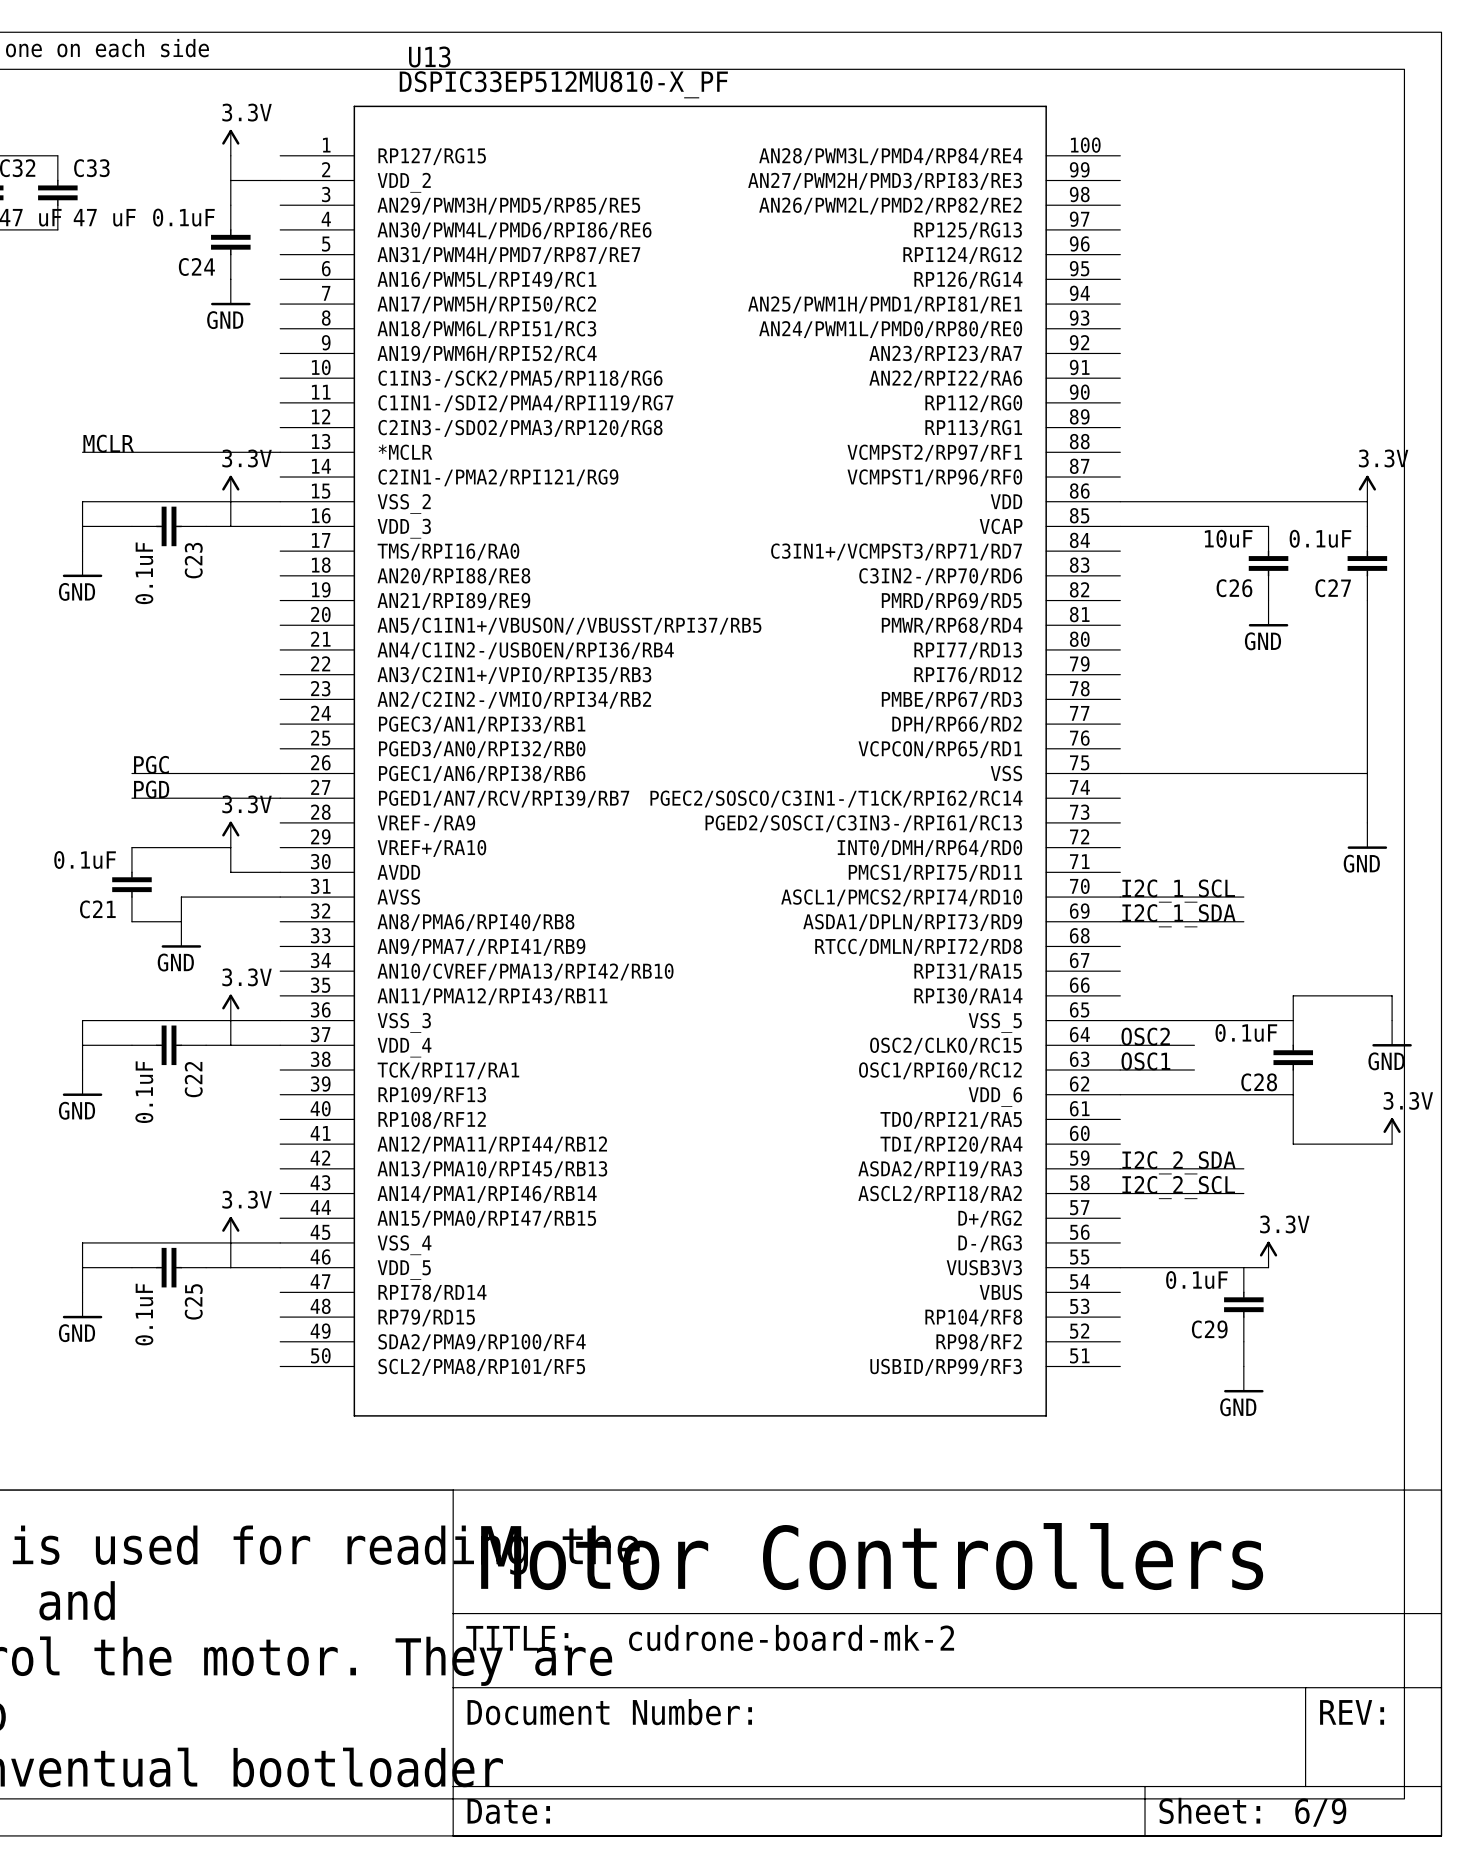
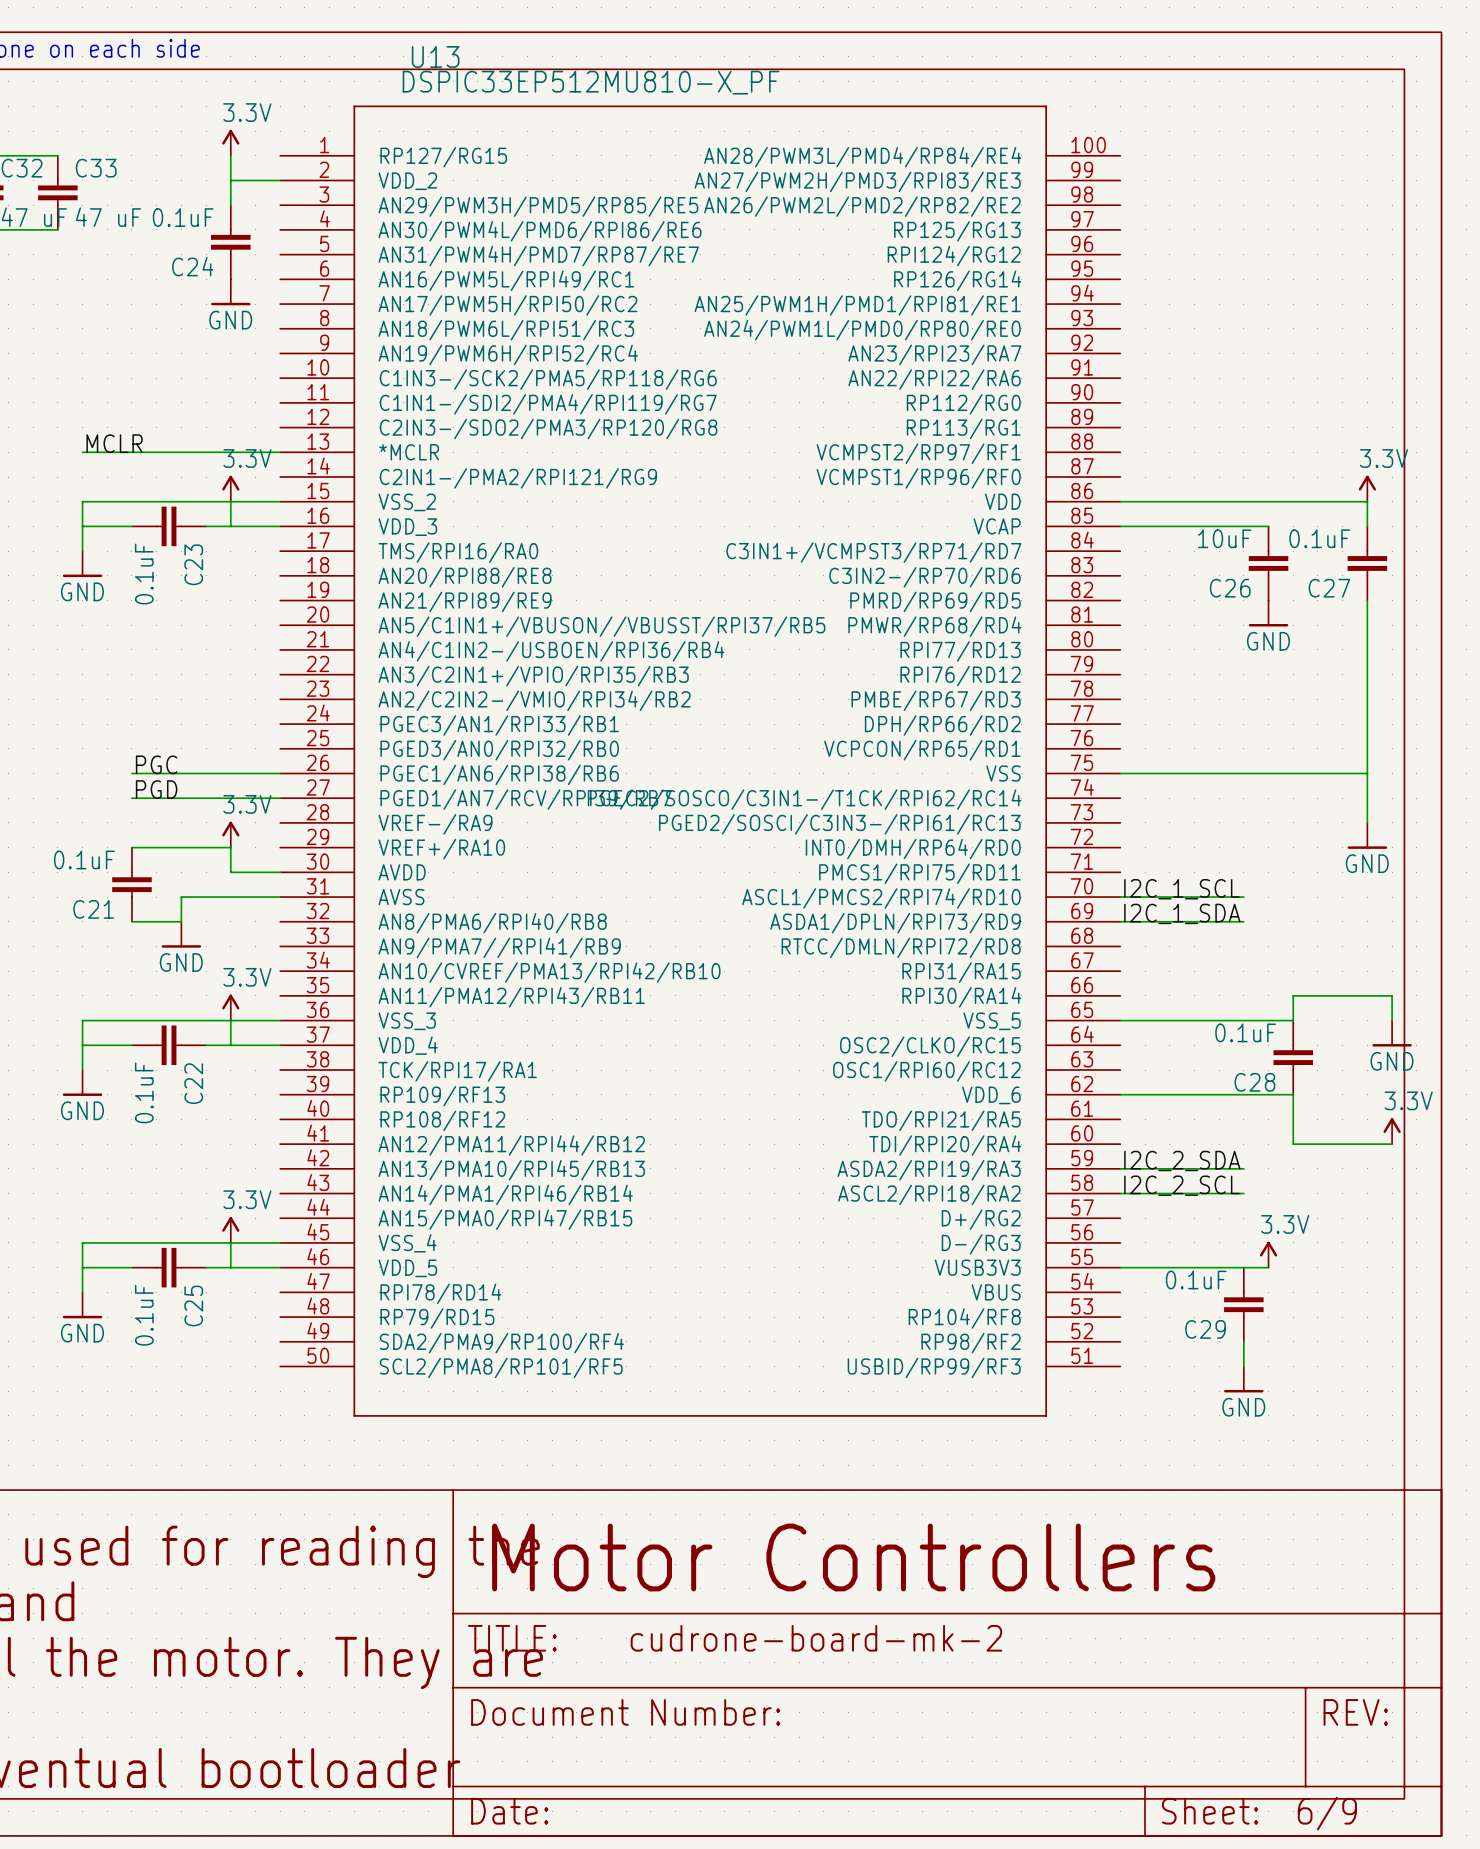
label: OSC2 (1145, 1036) -> none
wire: (1120, 1045) (1194, 1045) -> none
label: OSC1 (1145, 1061) -> none
wire: (1120, 1070) (1194, 1070) -> none

